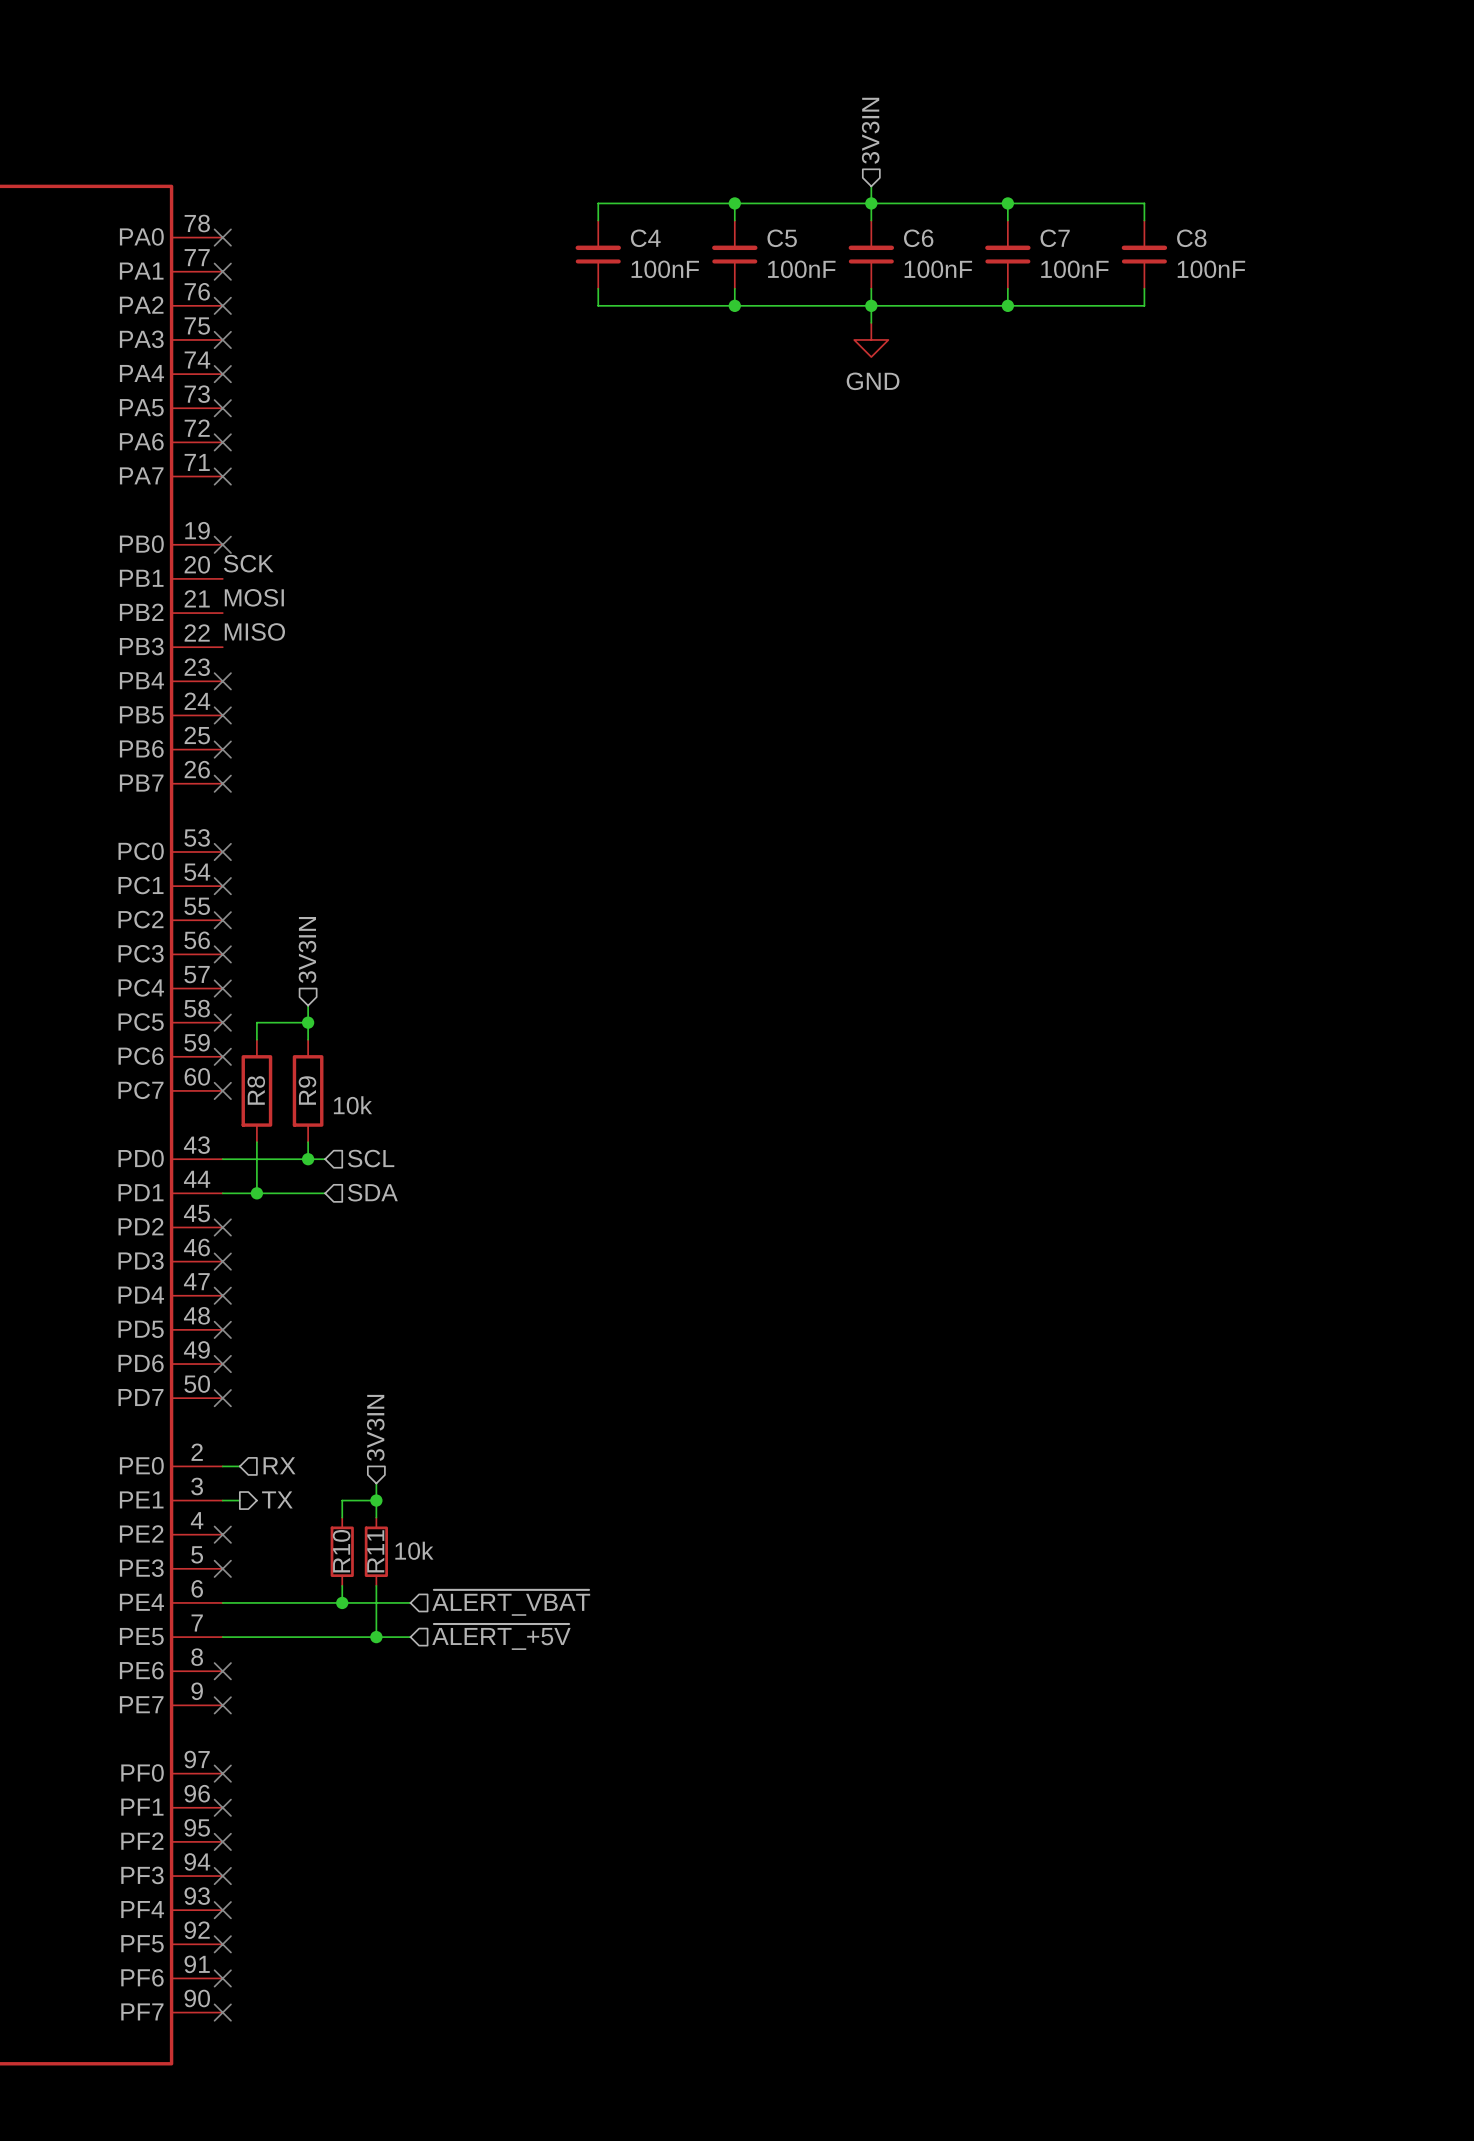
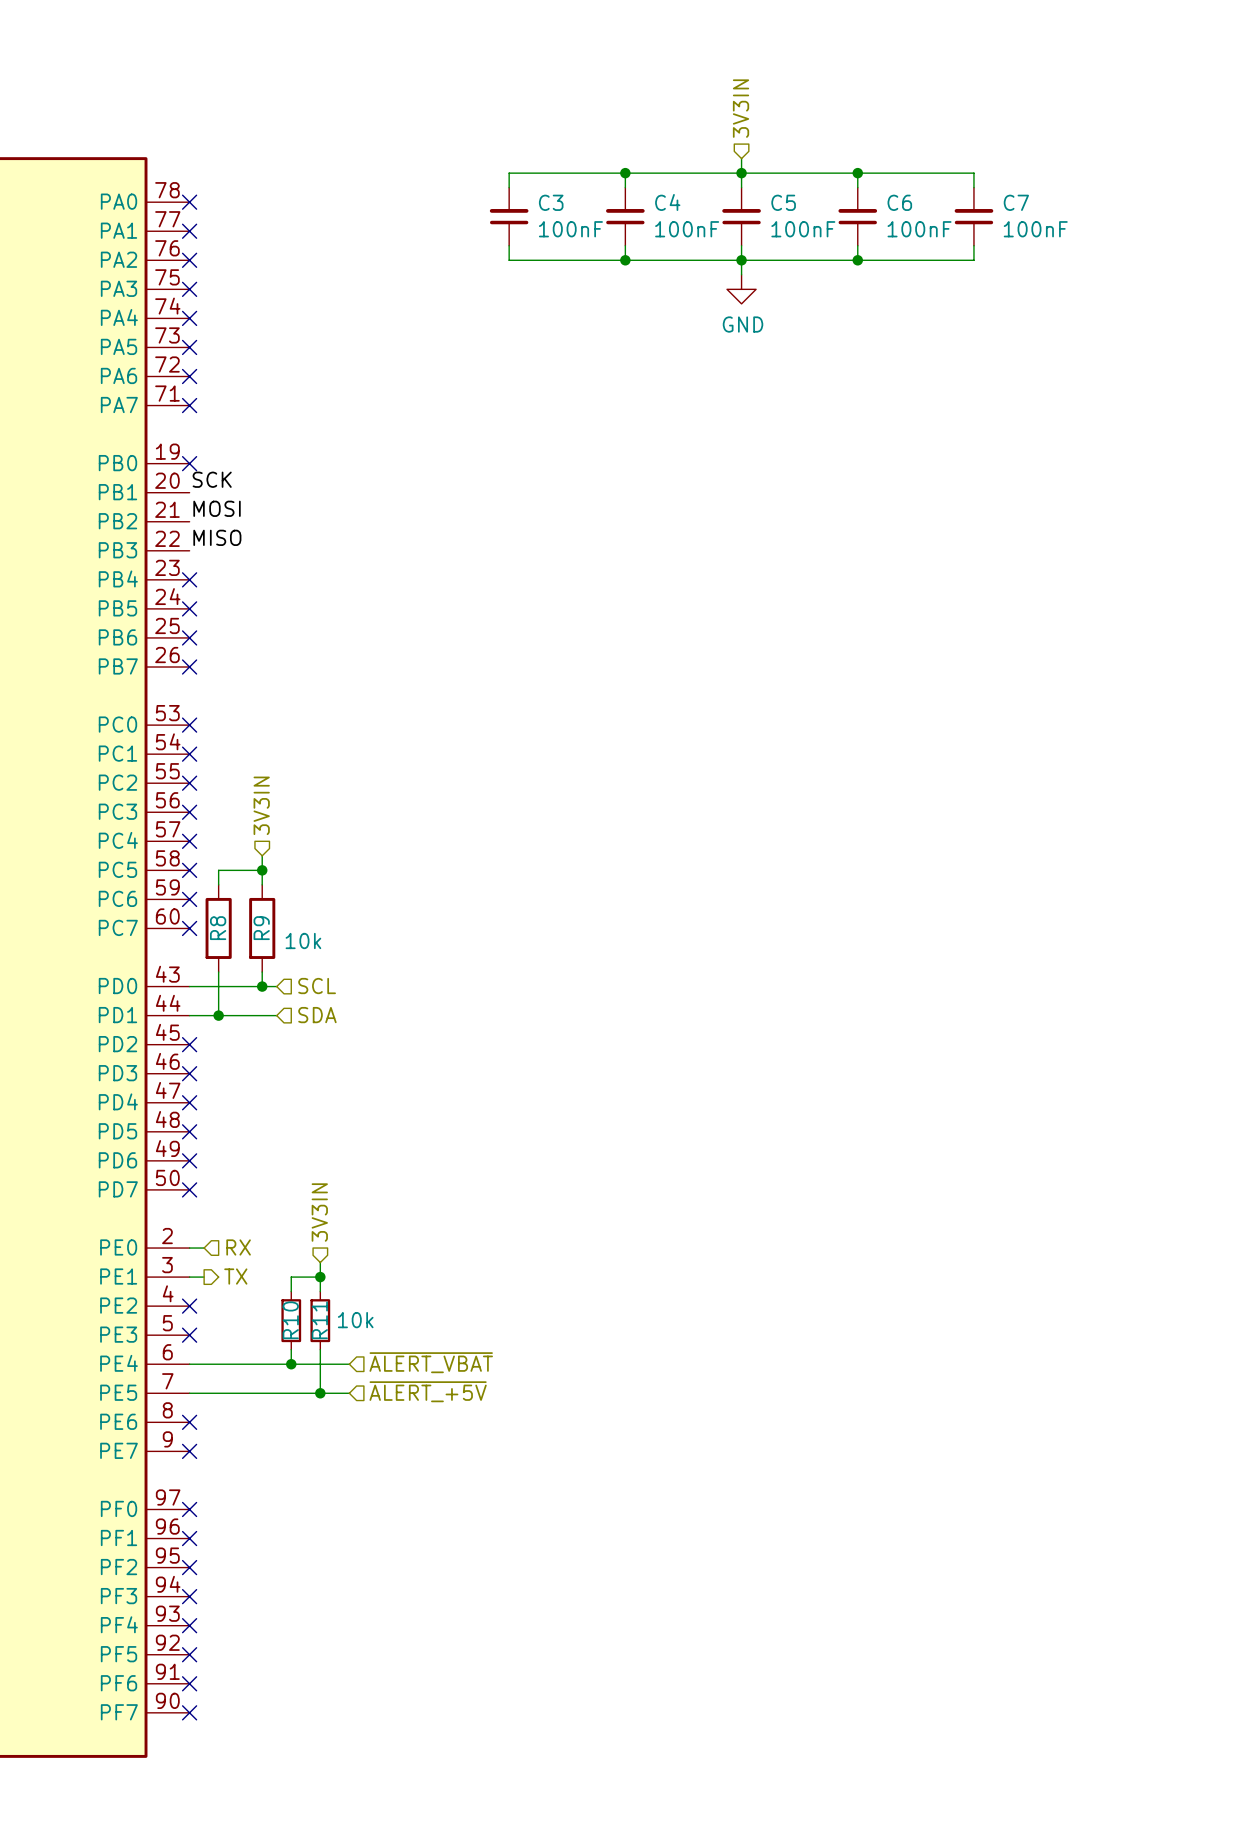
C4 name: C4 (645, 238) -> C3 (551, 202)
C5 name: C5 (782, 238) -> C4 (667, 202)
C6 name: C6 (918, 238) -> C5 (783, 202)
C7 name: C7 (1055, 238) -> C6 (899, 202)
C8 name: C8 (1191, 238) -> C7 (1016, 202)

